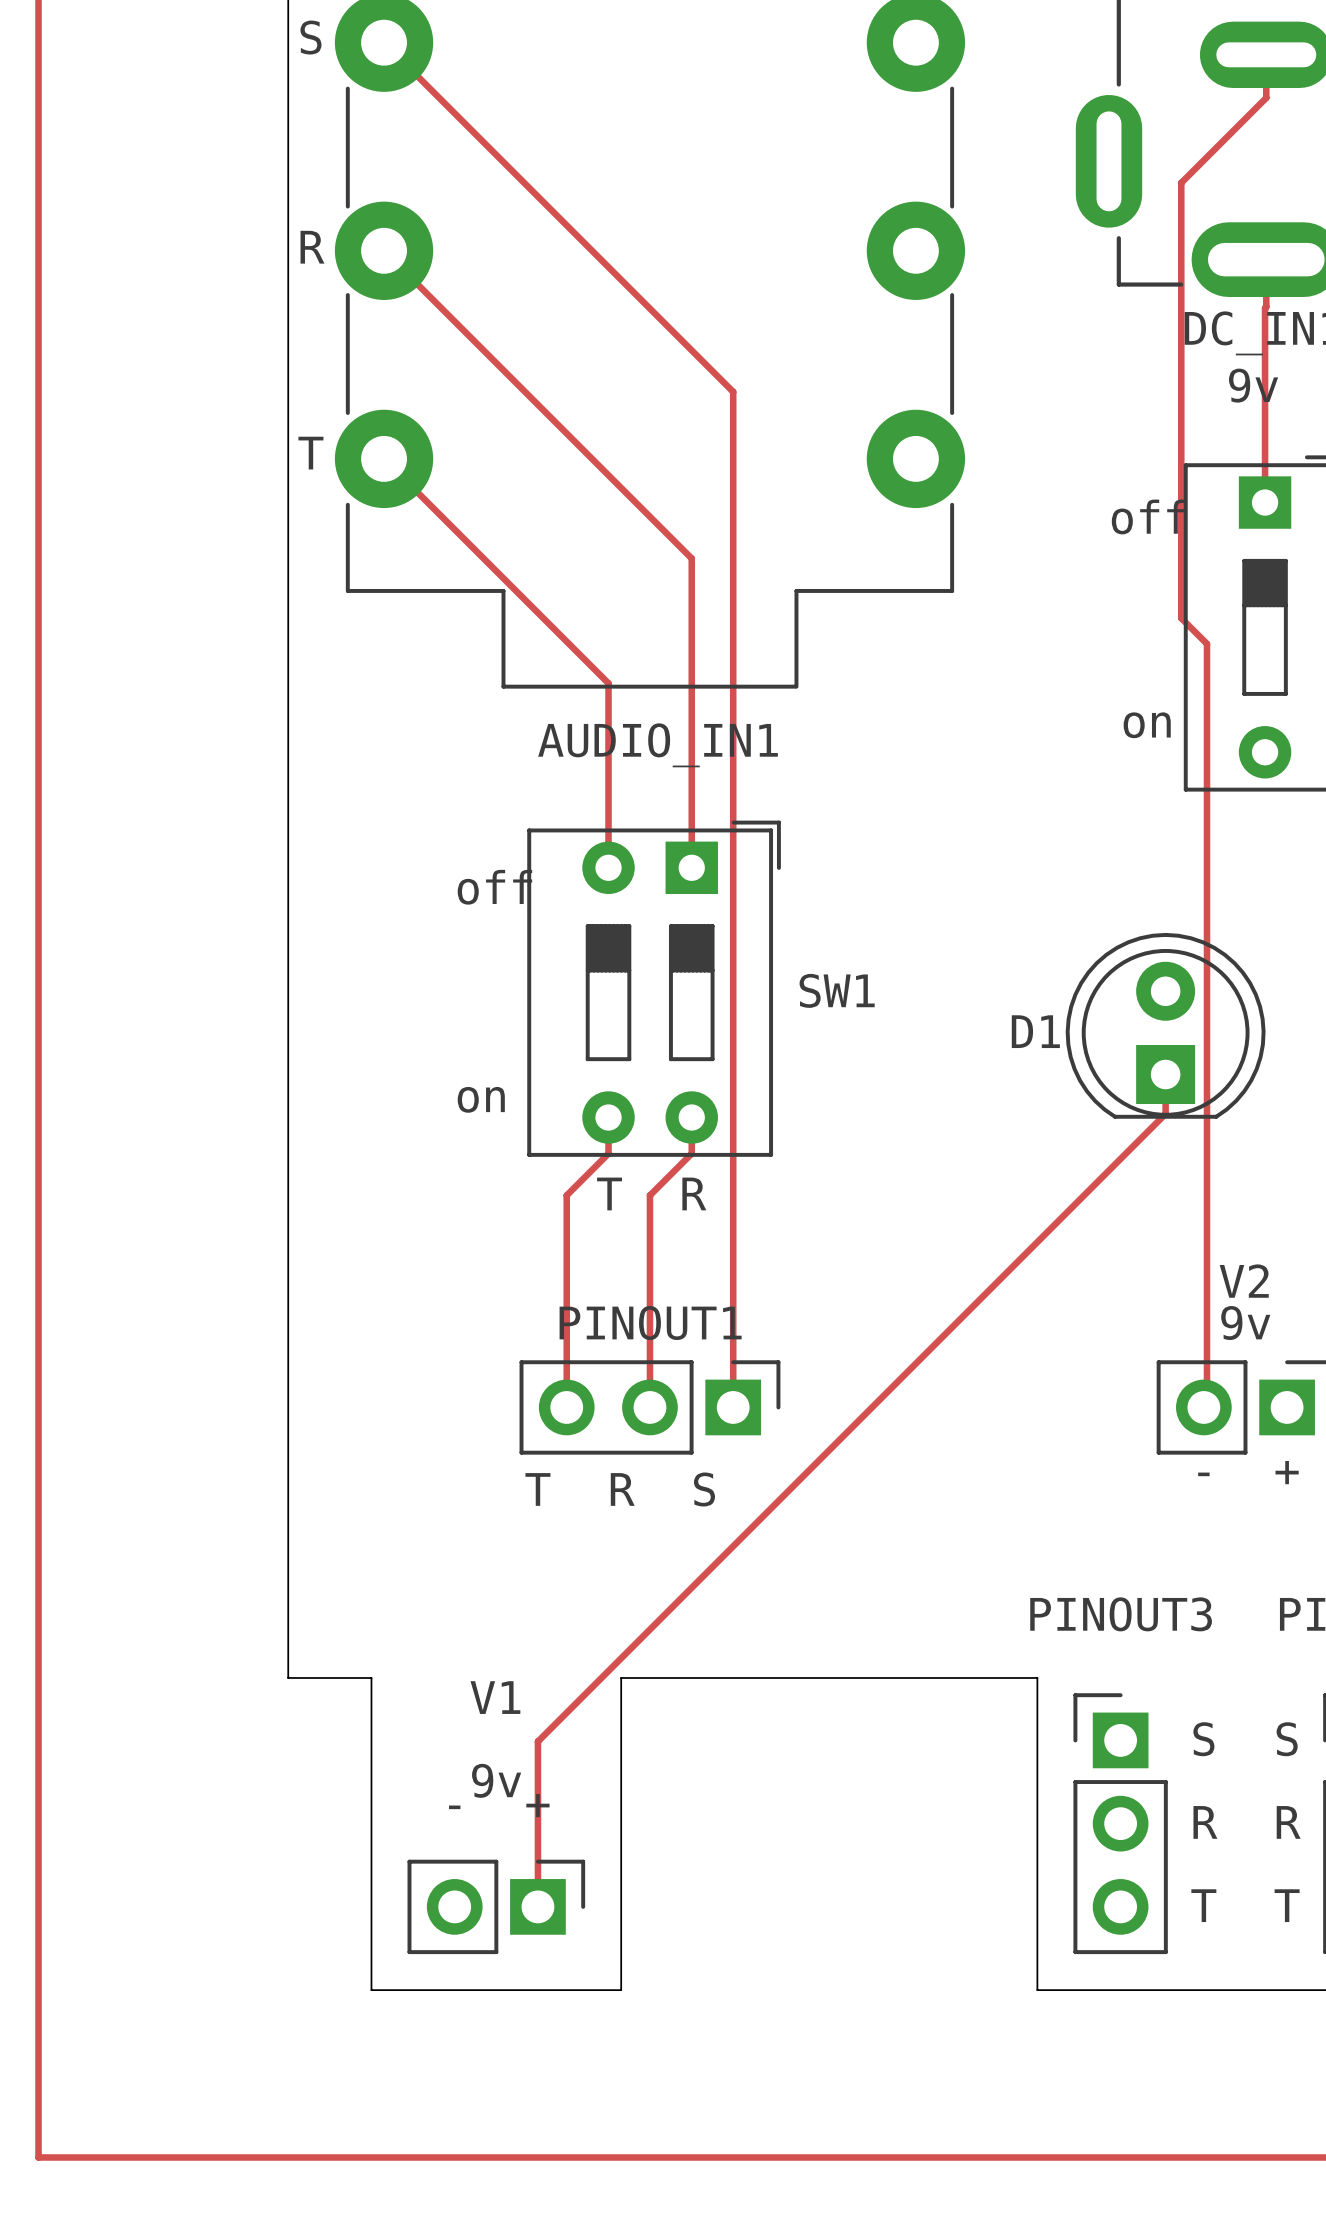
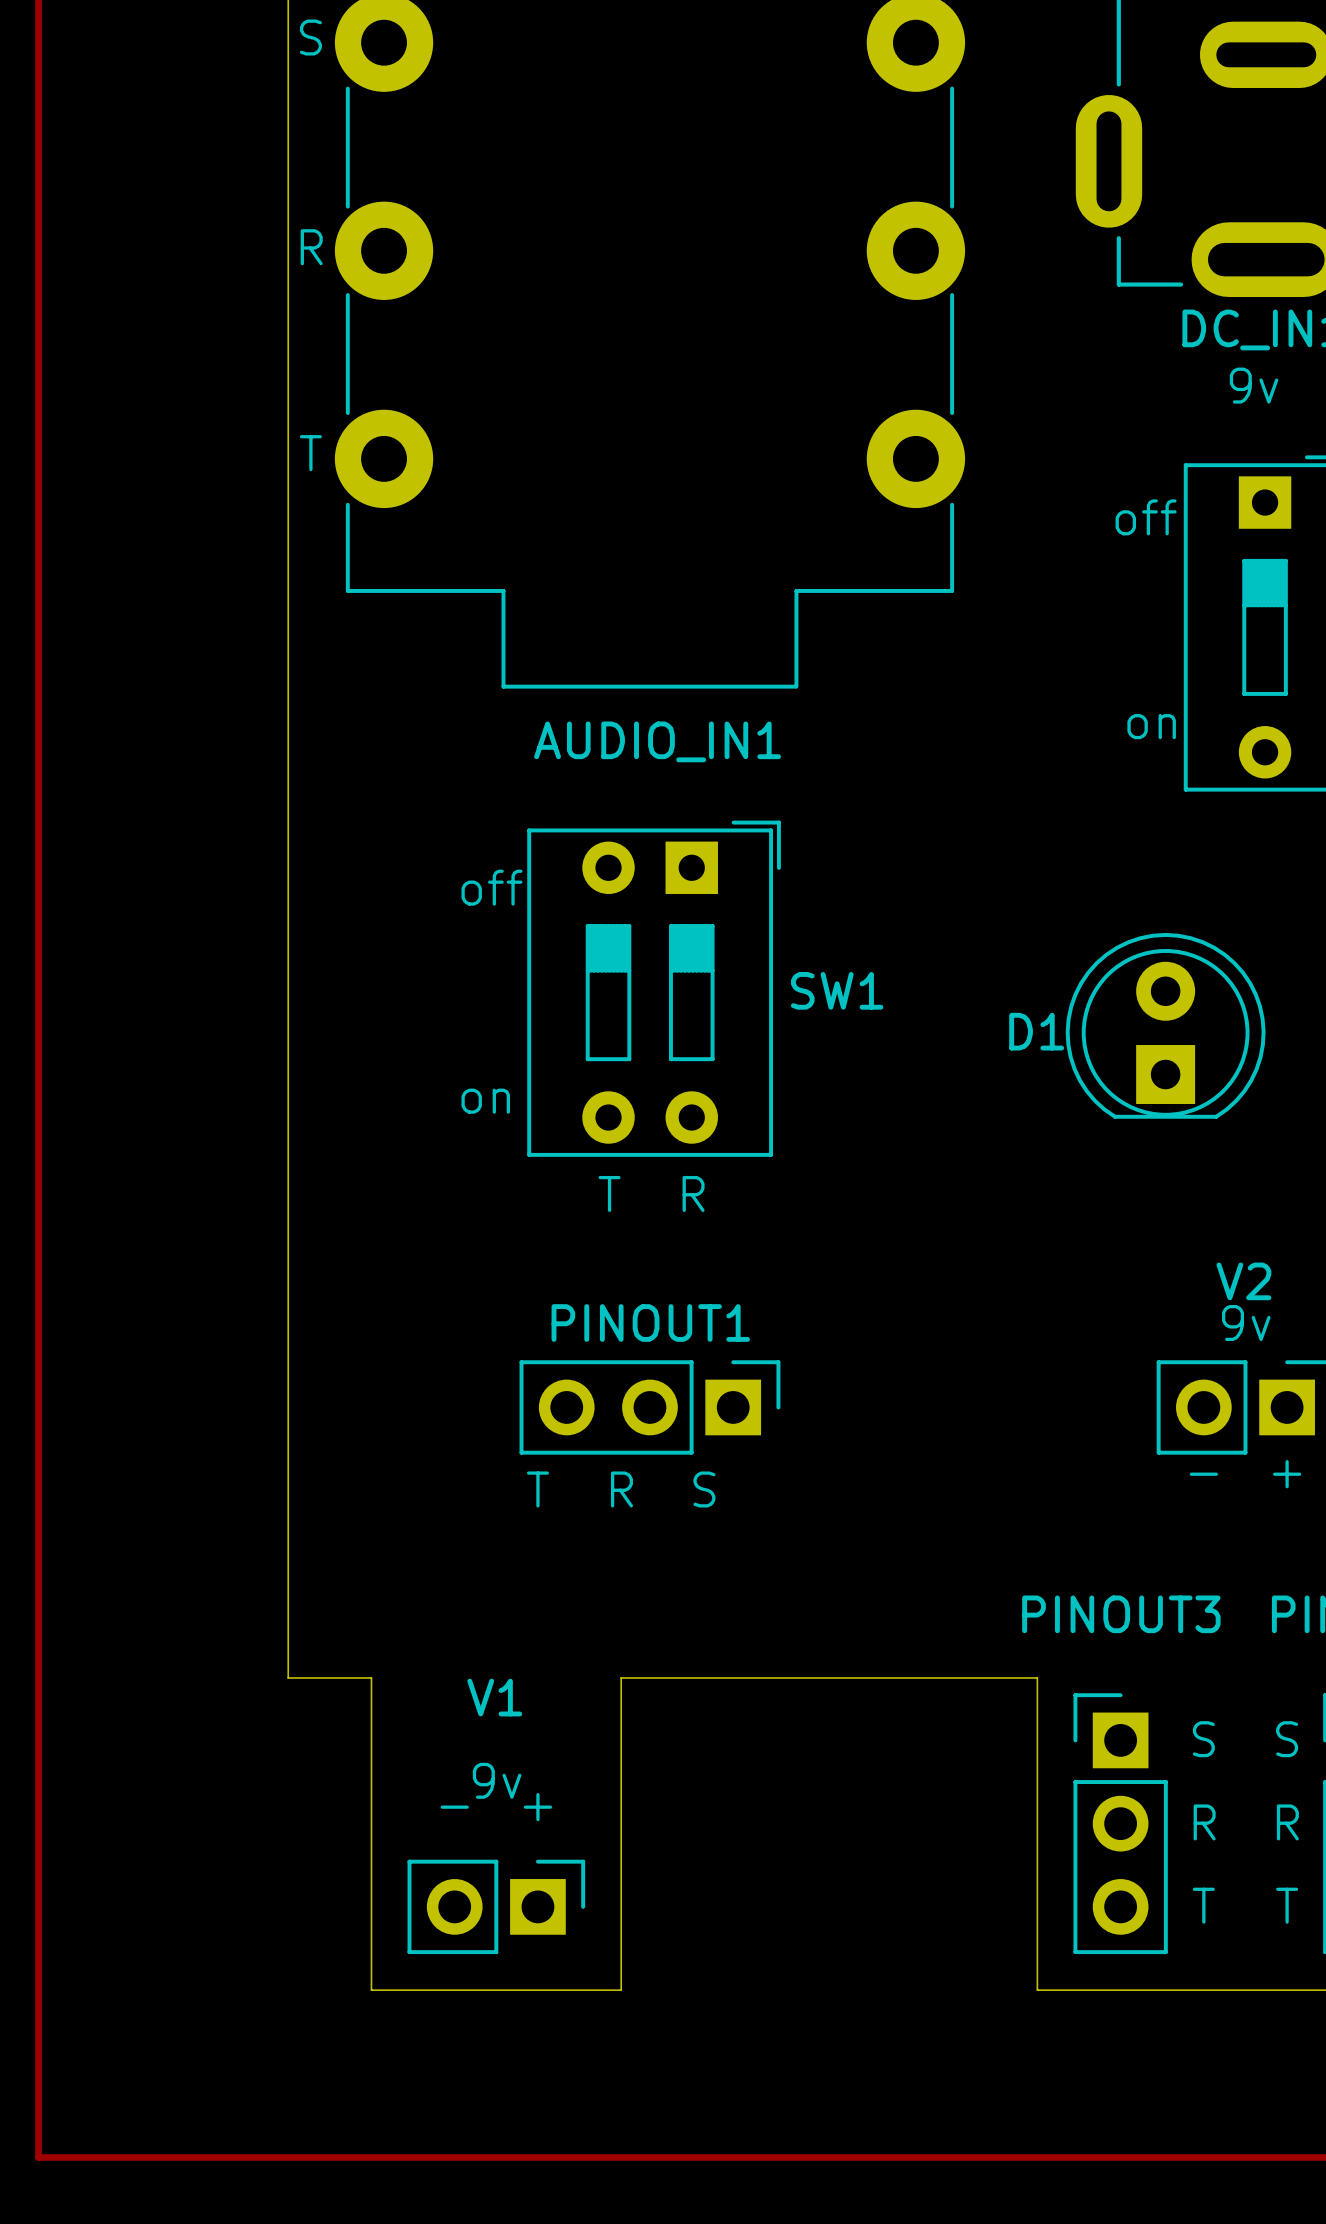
track: (384, 42) (733, 391) (733, 1407) -> none
track: (1266, 54) (1266, 97) (1181, 182) (1181, 618) (1207, 643) (1207, 1404) (1203, 1407) -> none
track: (384, 250) (691, 558) (691, 867) -> none
track: (1266, 259) (1265, 502) -> none
track: (384, 458) (608, 683) (608, 867) -> none
track: (1165, 1074) (1165, 1113) (537, 1741) (537, 1906) -> none
track: (608, 1117) (608, 1153) (566, 1195) (566, 1407) -> none
track: (691, 1117) (691, 1153) (649, 1195) (649, 1407) -> none

